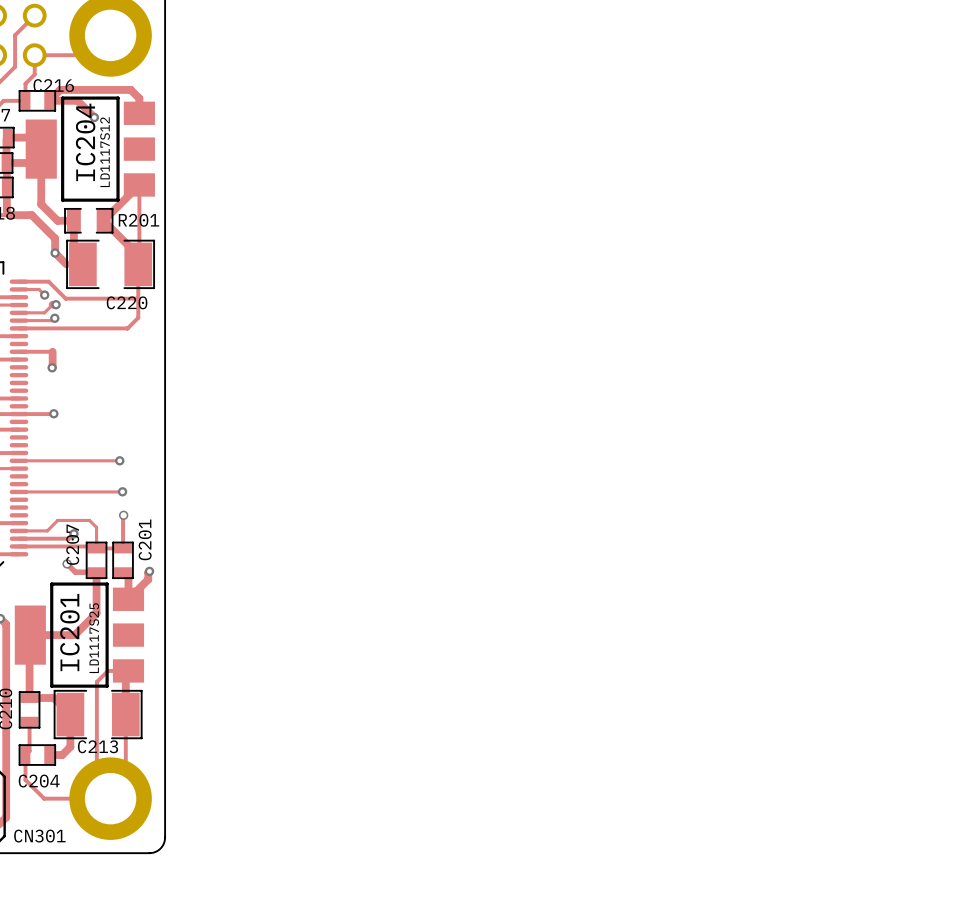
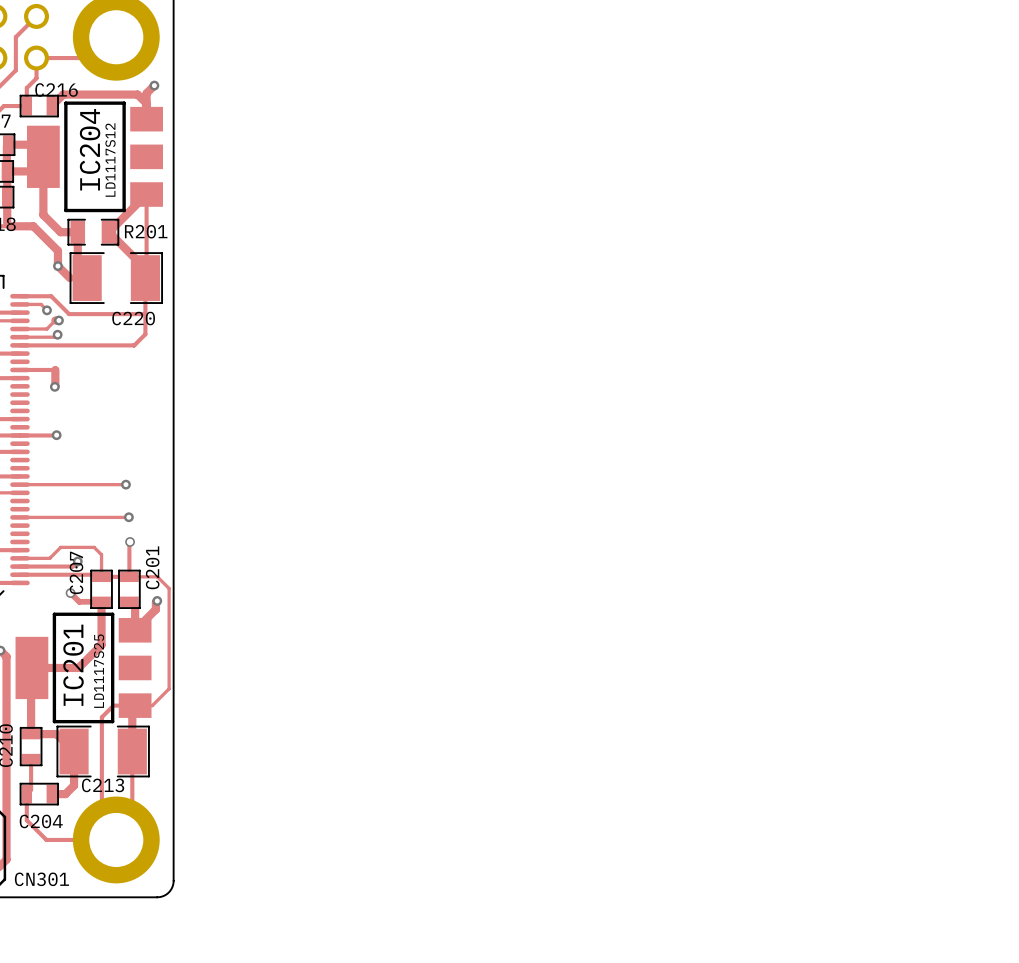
track: none -> (154, 85) (146, 93) (146, 103)
track: (49, 100) (77, 100) (94, 117) -> none
via position: (94, 117) -> (154, 85)
track: none -> (129, 576) (157, 576) (169, 588) (169, 688) (152, 705) (135, 705)

